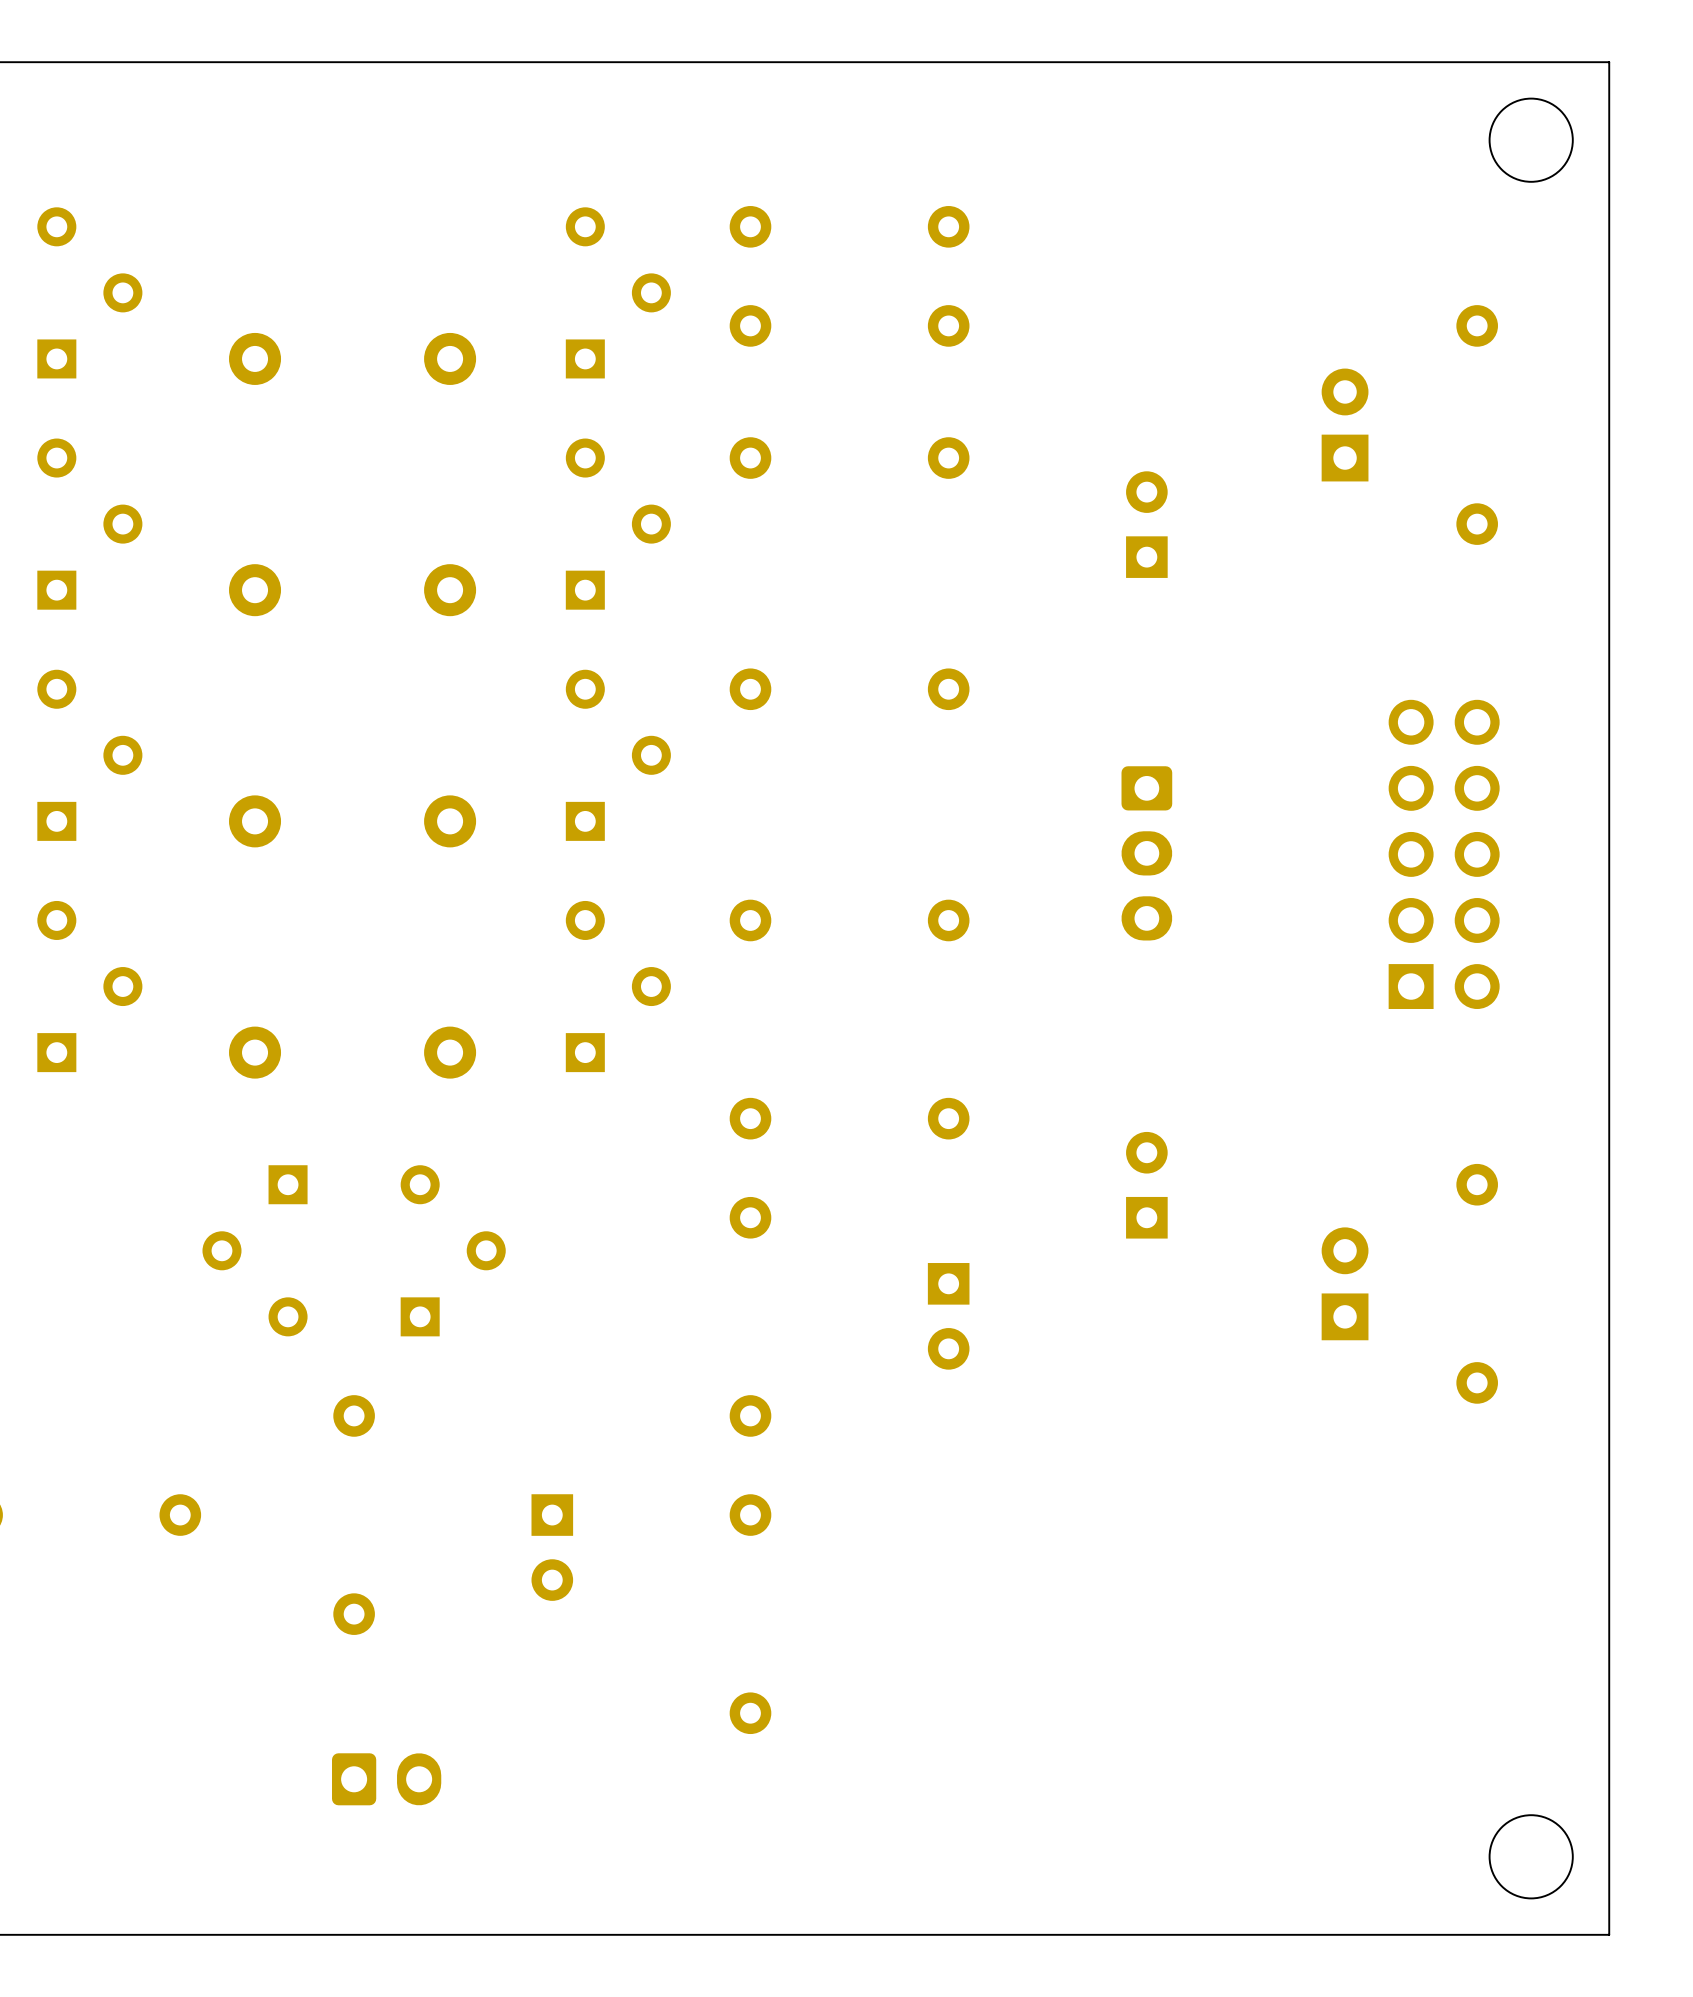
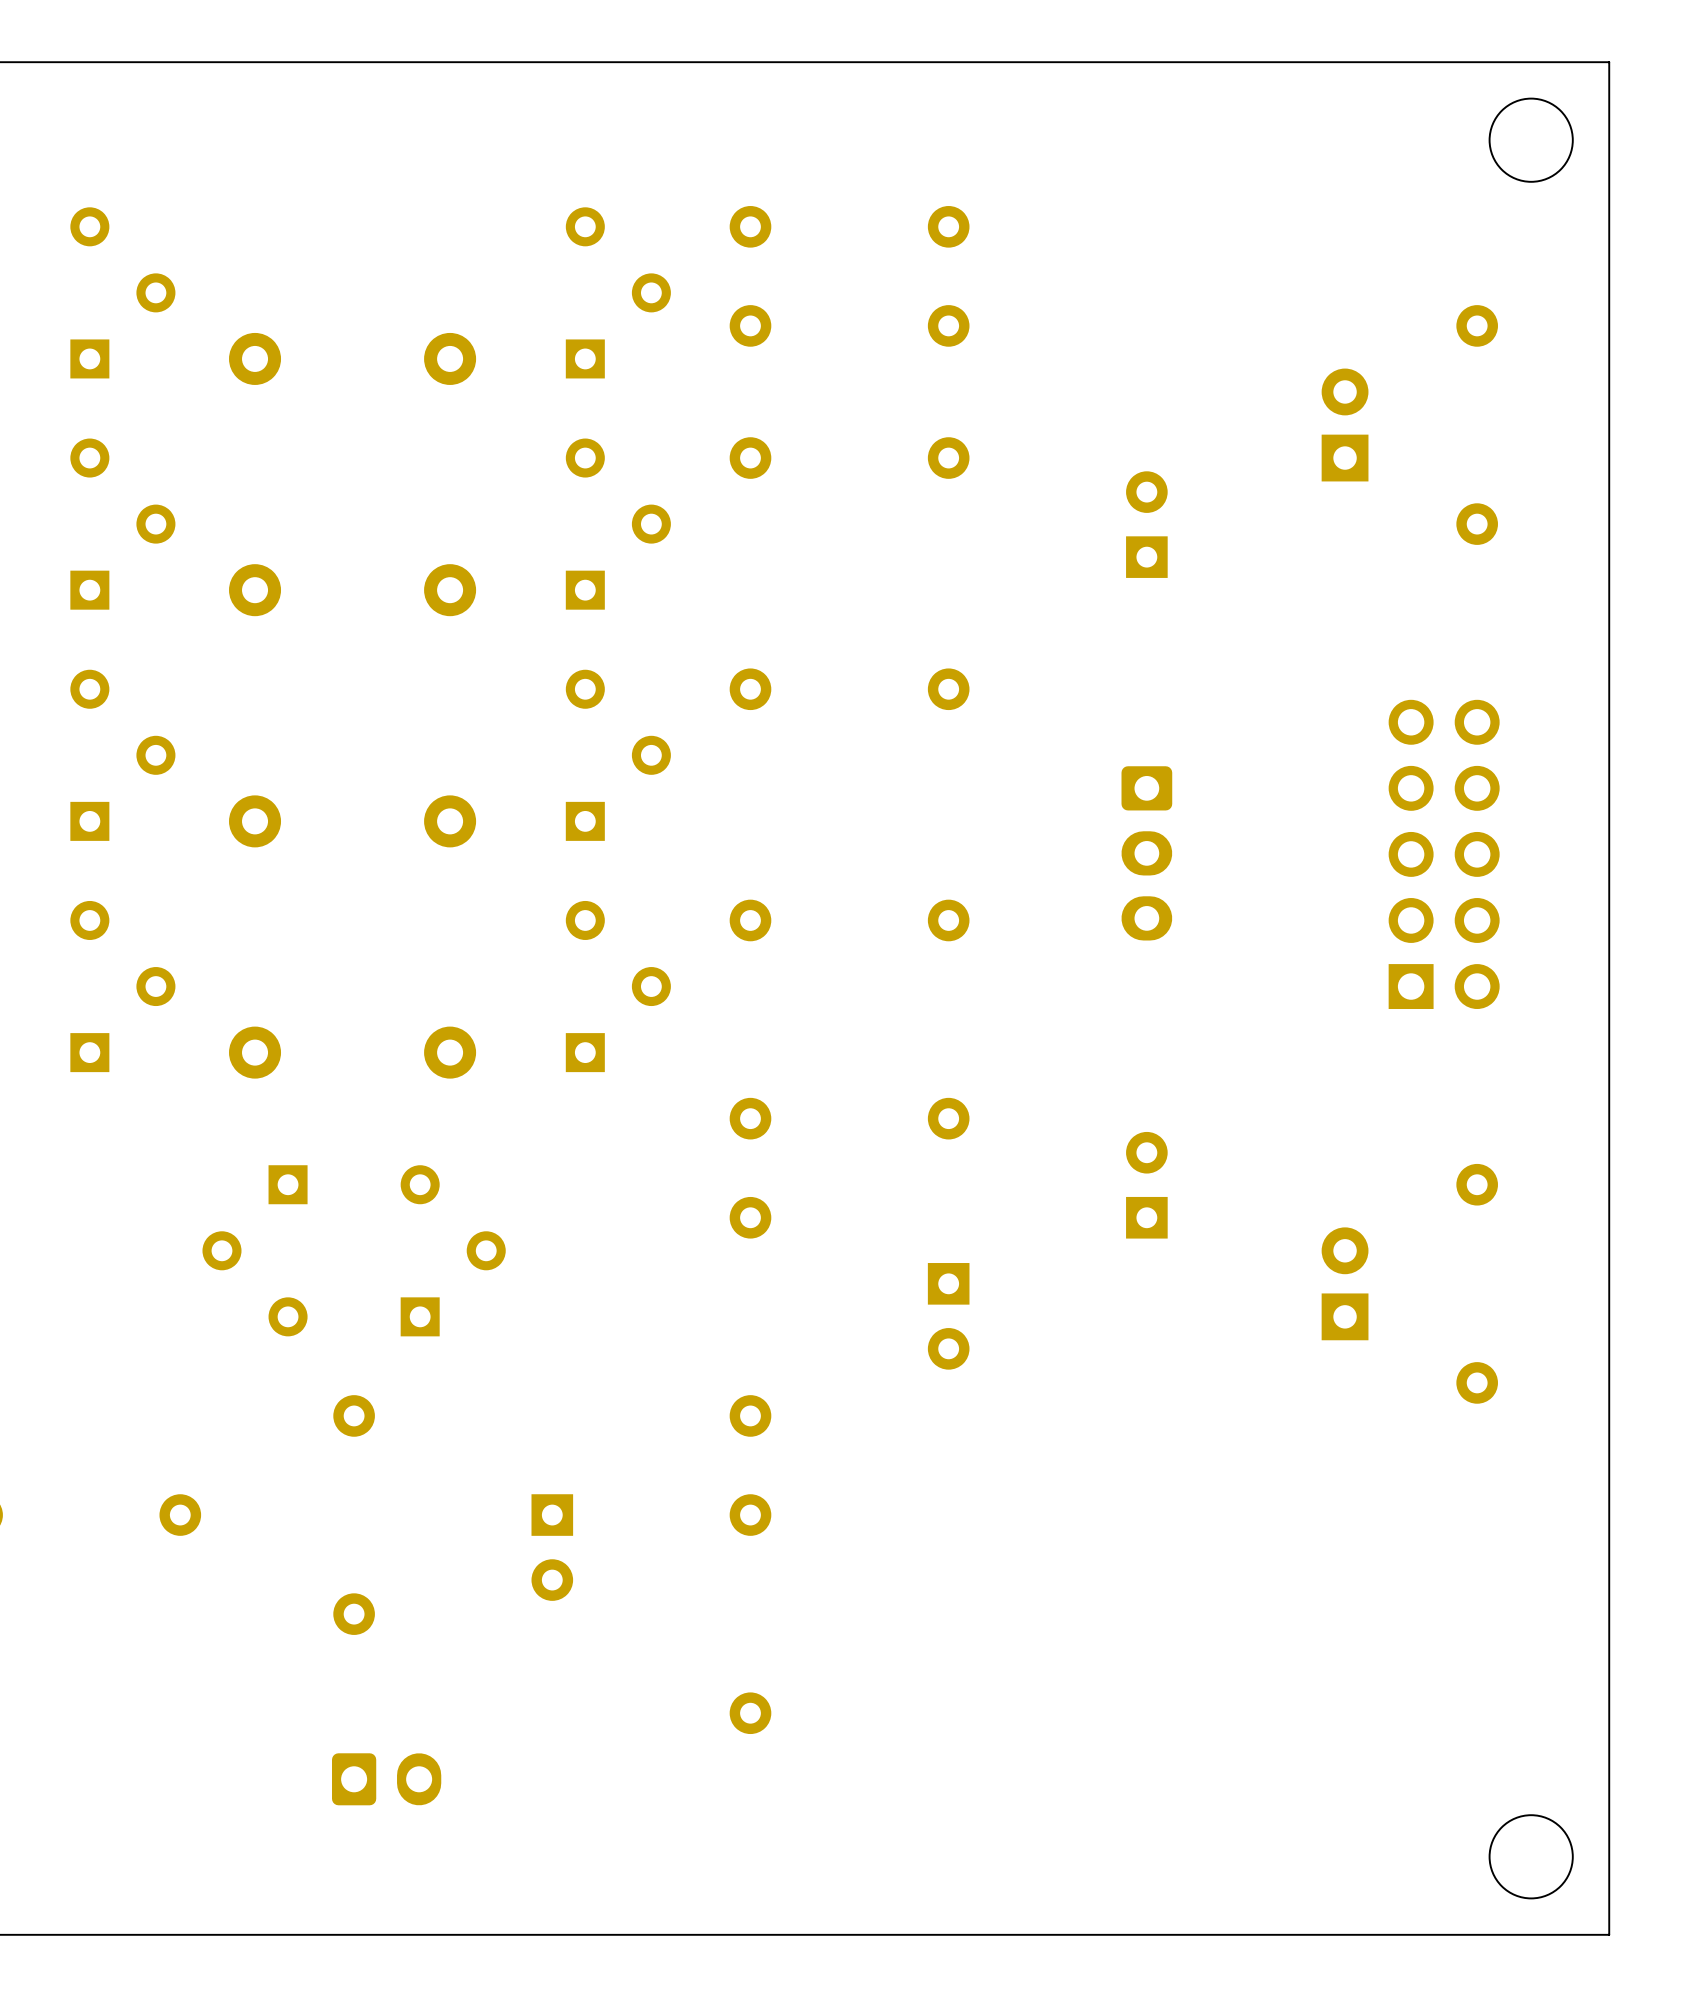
part position: (89, 292) -> (122, 292)
part position: (89, 524) -> (122, 524)
part position: (89, 755) -> (122, 755)
part position: (89, 986) -> (122, 986)

